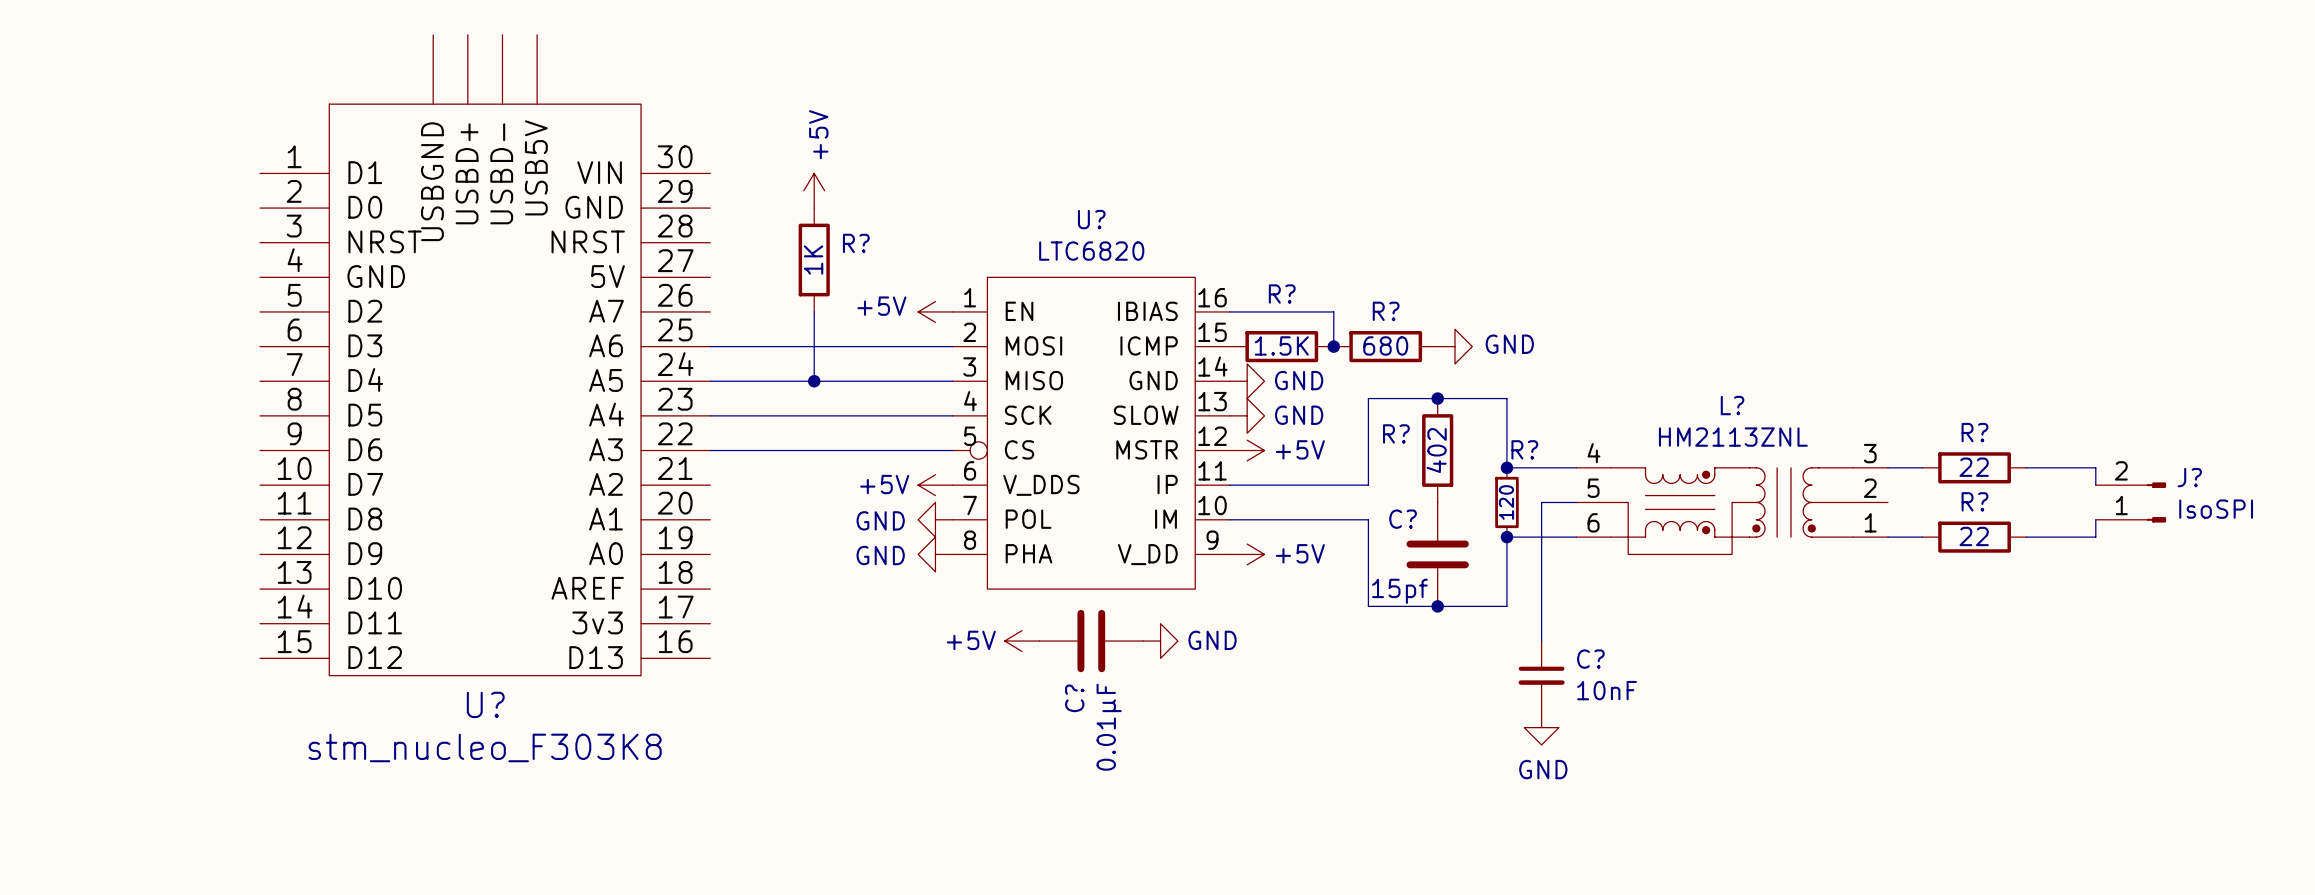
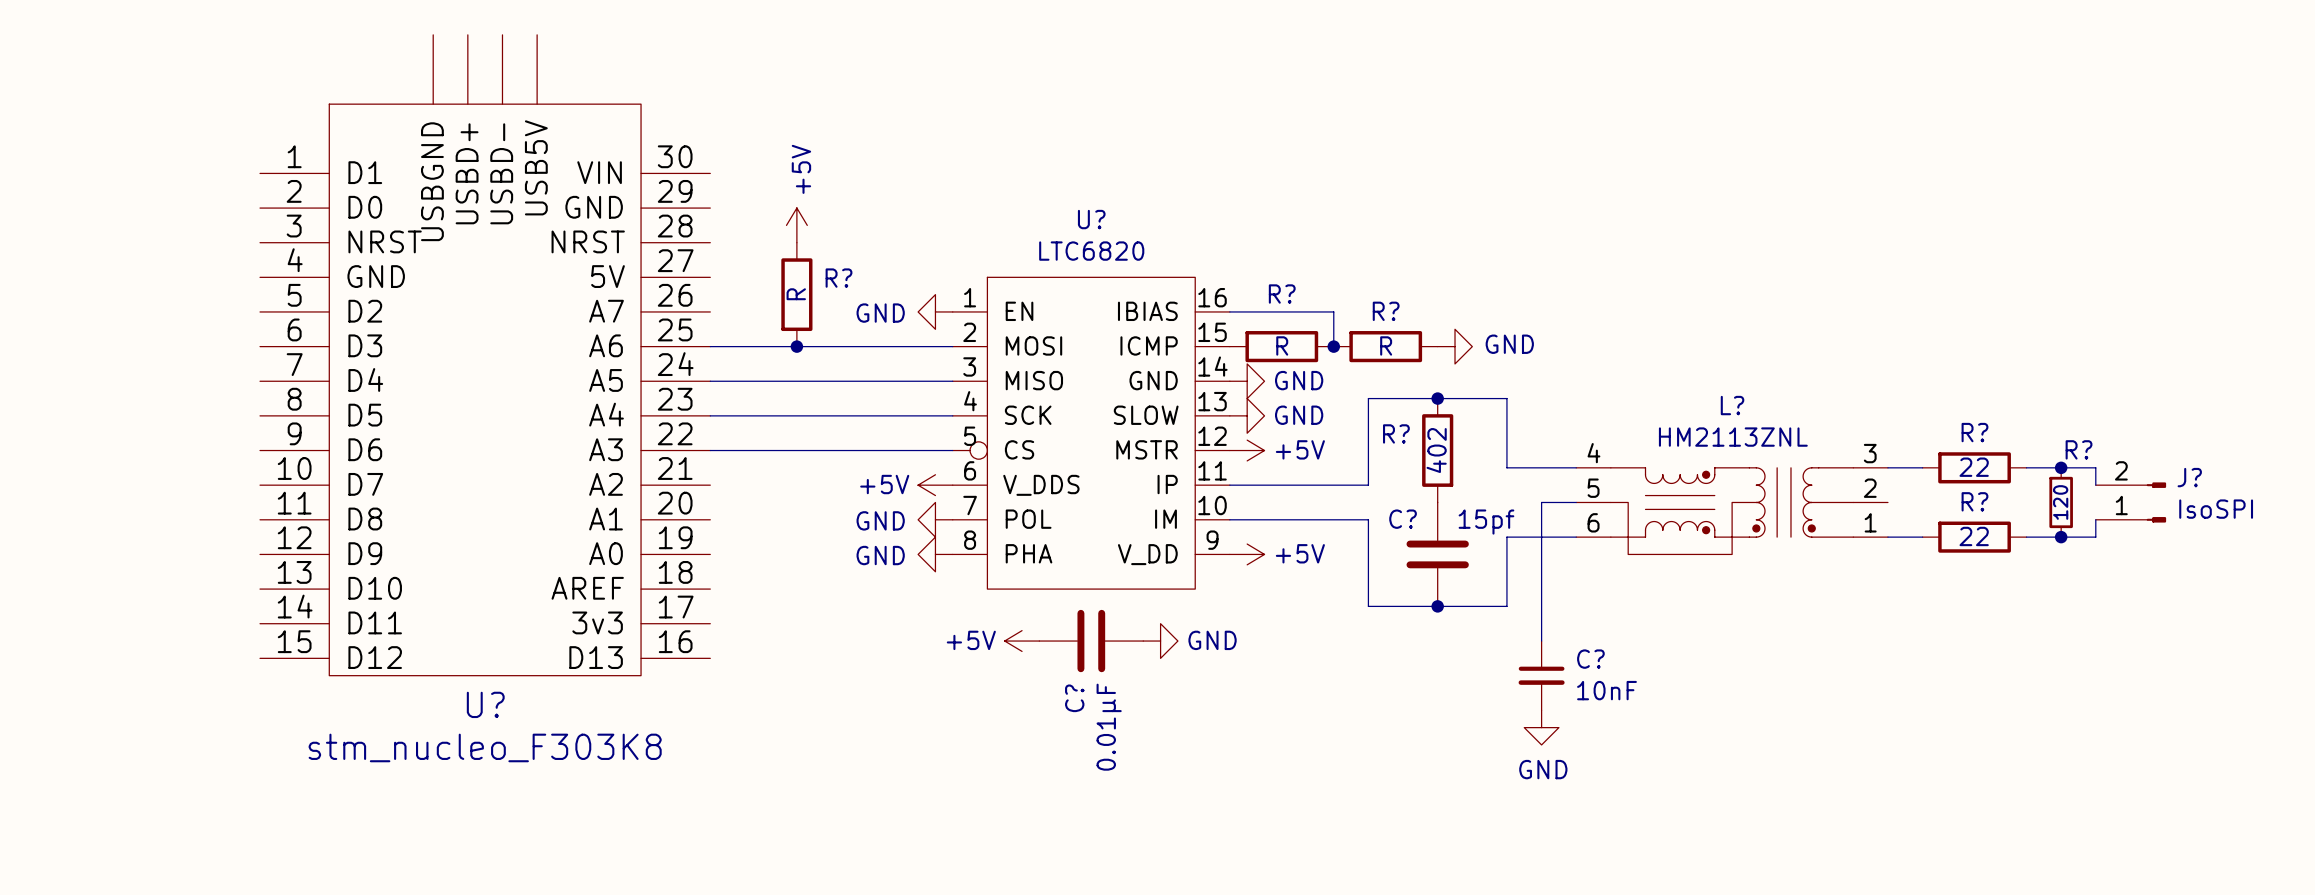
power symbol position: +5V (814, 190) -> +5V (796, 225)
R?: 1K (814, 260) -> none
R?: none -> R (796, 294)
wire: (814, 311) (814, 381) -> none
power symbol: +5V (935, 311) -> GND (935, 311)
R? value: 1.5K (1281, 345) -> R (1282, 345)
R? value: 680 (1385, 345) -> R (1386, 345)
junction position: (814, 381) -> (796, 346)
junction: (1506, 467) -> none
junction: none -> (2061, 467)
R?: 120 (1506, 502) -> none
R?: none -> 120 (2061, 502)
junction: (1506, 537) -> none
junction: none -> (2061, 537)
C? value position: 15pf (1399, 591) -> 15pf (1486, 522)

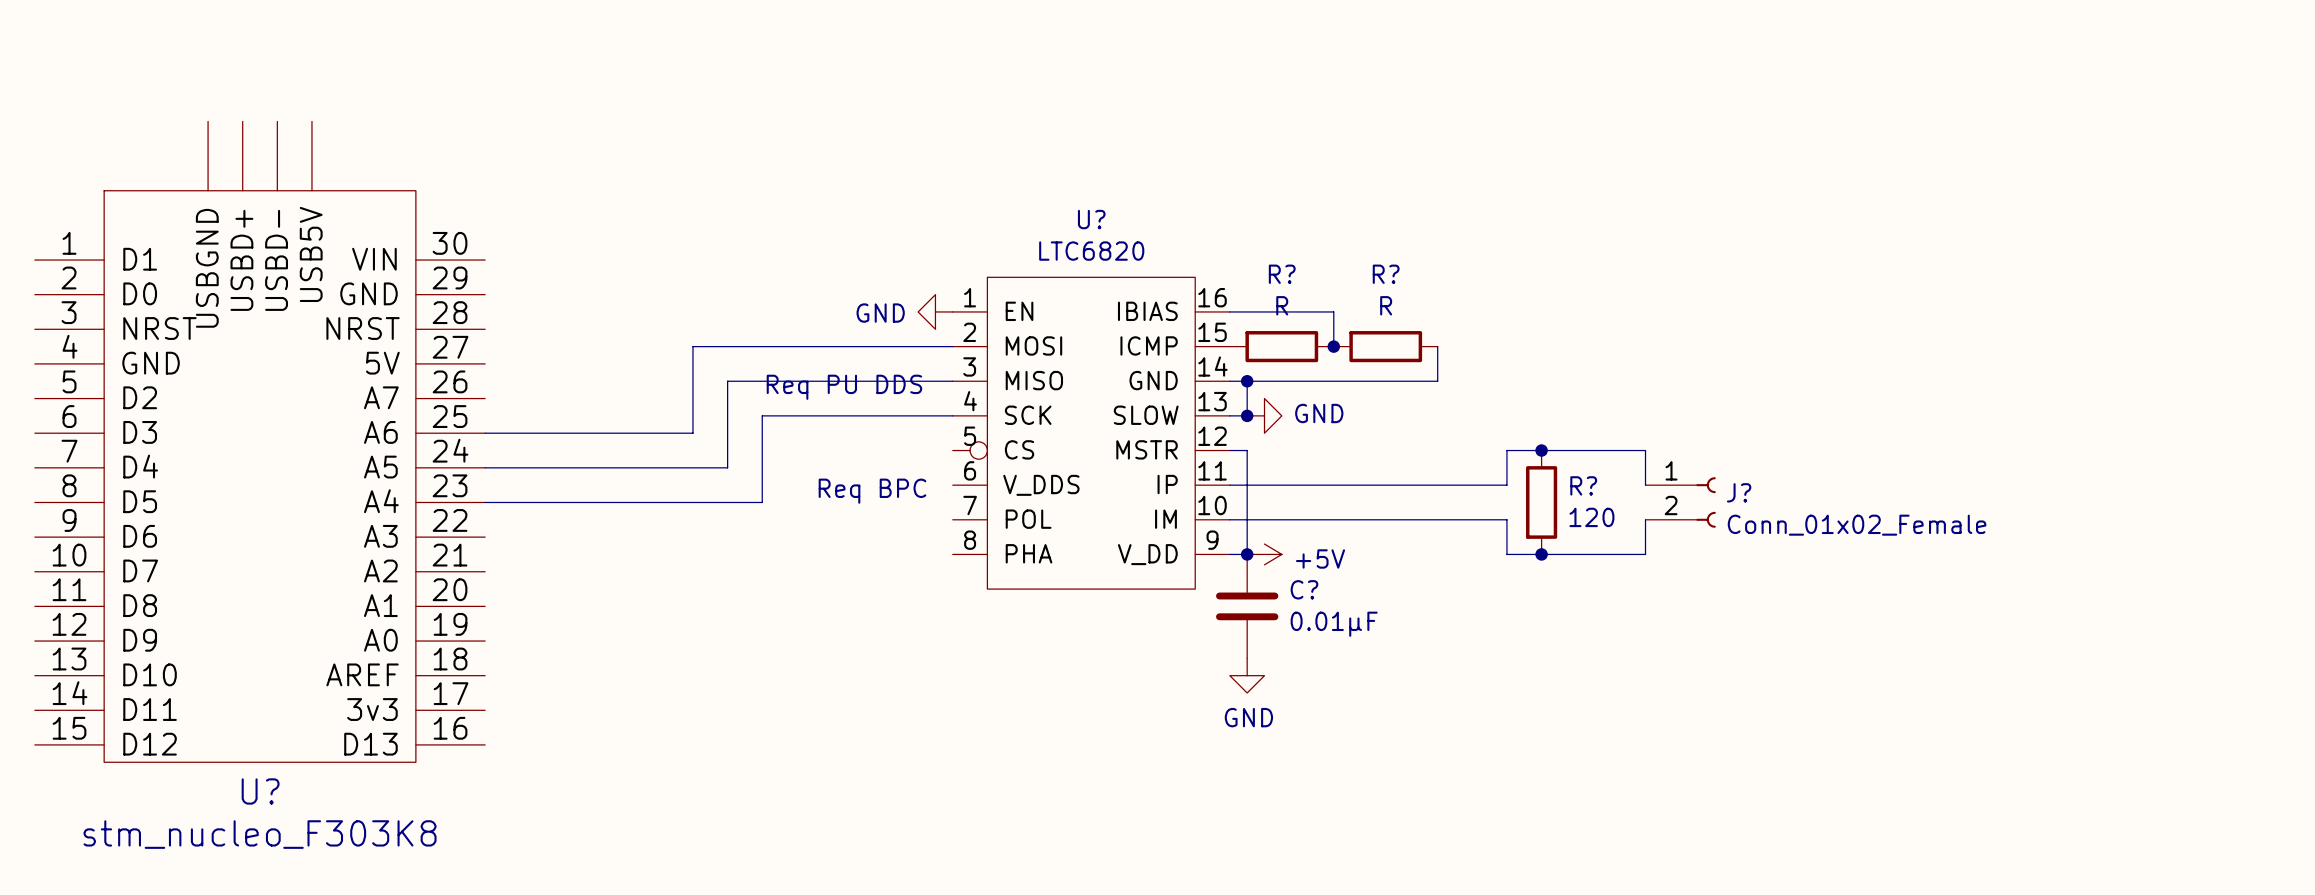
power symbol: +5V (796, 225) -> none
R?: R (796, 294) -> none
R? name position: R? (1282, 294) -> R? (1282, 274)
R? name position: R? (1386, 311) -> R? (1386, 274)
R? value position: R (1282, 345) -> R (1282, 305)
R? value position: R (1386, 345) -> R (1386, 305)
wire: none -> (710, 346) (692, 346) (692, 433) (485, 433)
junction: (796, 346) -> none
wire: none -> (1437, 346) (1437, 381) (1229, 381)
power symbol: GND (1455, 346) -> none
U? position: (485, 355) -> (260, 441)
wire: (710, 381) (727, 381) -> (485, 467) (727, 467) (727, 381)
power symbol: GND (1247, 381) -> none
junction: none -> (1247, 381)
text: none -> Req PU DDS (844, 387)
junction: (1437, 398) -> none
wire: (710, 415) (762, 415) -> (485, 502) (762, 502) (762, 415)
power symbol position: GND (1247, 415) -> GND (1264, 415)
junction: none -> (1247, 415)
power symbol text position: GND (1299, 415) -> GND (1319, 413)
wire: (710, 450) (952, 450) -> none
wire: none -> (1229, 450) (1247, 450) (1247, 554) (1229, 554)
power symbol: +5V (1247, 450) -> none
R?: 402 (1437, 450) -> none
wire: (1506, 450) (1506, 398) (1368, 398) (1368, 485) -> (1506, 467) (1506, 485) (1368, 485)
wire: none -> (1506, 450) (1645, 450) (1645, 485)
junction: none -> (1541, 450)
wire: (1506, 467) (1576, 467) -> none
wire: (1887, 467) (1922, 467) -> none
R?: 22 (1974, 467) -> none
wire: (2026, 467) (2095, 467) (2095, 485) -> none
junction: (2061, 467) -> none
power symbol: +5V (935, 485) -> none
text: none -> Req BPC (872, 491)
R?: none -> 120 (1541, 502)
wire: (1576, 502) (1541, 502) (1541, 641) -> none
J?: none -> Conn_01x02_Female (1680, 502)
R?: 120 (2061, 502) -> none
J?: IsoSPI (2130, 502) -> none
L?: HM2113ZNL (1732, 511) -> none
power symbol: GND (935, 519) -> none
wire: (1368, 519) (1368, 606) (1506, 606) (1506, 554) -> (1368, 519) (1506, 519) (1506, 537)
wire: none -> (1645, 519) (1645, 554) (1506, 554)
wire: (2095, 519) (2095, 537) (2026, 537) -> none
wire: (1506, 537) (1576, 537) -> none
wire: (1887, 537) (1922, 537) -> none
R?: 22 (1974, 537) -> none
junction: (2061, 537) -> none
power symbol text position: +5V (1300, 553) -> +5V (1320, 558)
power symbol: GND (935, 554) -> none
power symbol position: +5V (1247, 554) -> +5V (1264, 554)
junction: none -> (1247, 554)
C?: 15pf (1437, 554) -> none
junction: none -> (1541, 554)
junction: (1437, 606) -> none
power symbol: +5V (1022, 641) -> none
C? rotation: 0° (1091, 641) -> 90° clockwise (1247, 606)
C? position: (1091, 641) -> (1247, 606)
power symbol rotation: 0° (1160, 641) -> 90° clockwise (1247, 675)
power symbol position: GND (1160, 641) -> GND (1247, 675)
C?: 10nF (1541, 675) -> none
C? name position: C? (1074, 698) -> C? (1304, 589)
C? value position: 0.01μF (1109, 727) -> 0.01μF (1334, 624)
power symbol: GND (1541, 727) -> none

